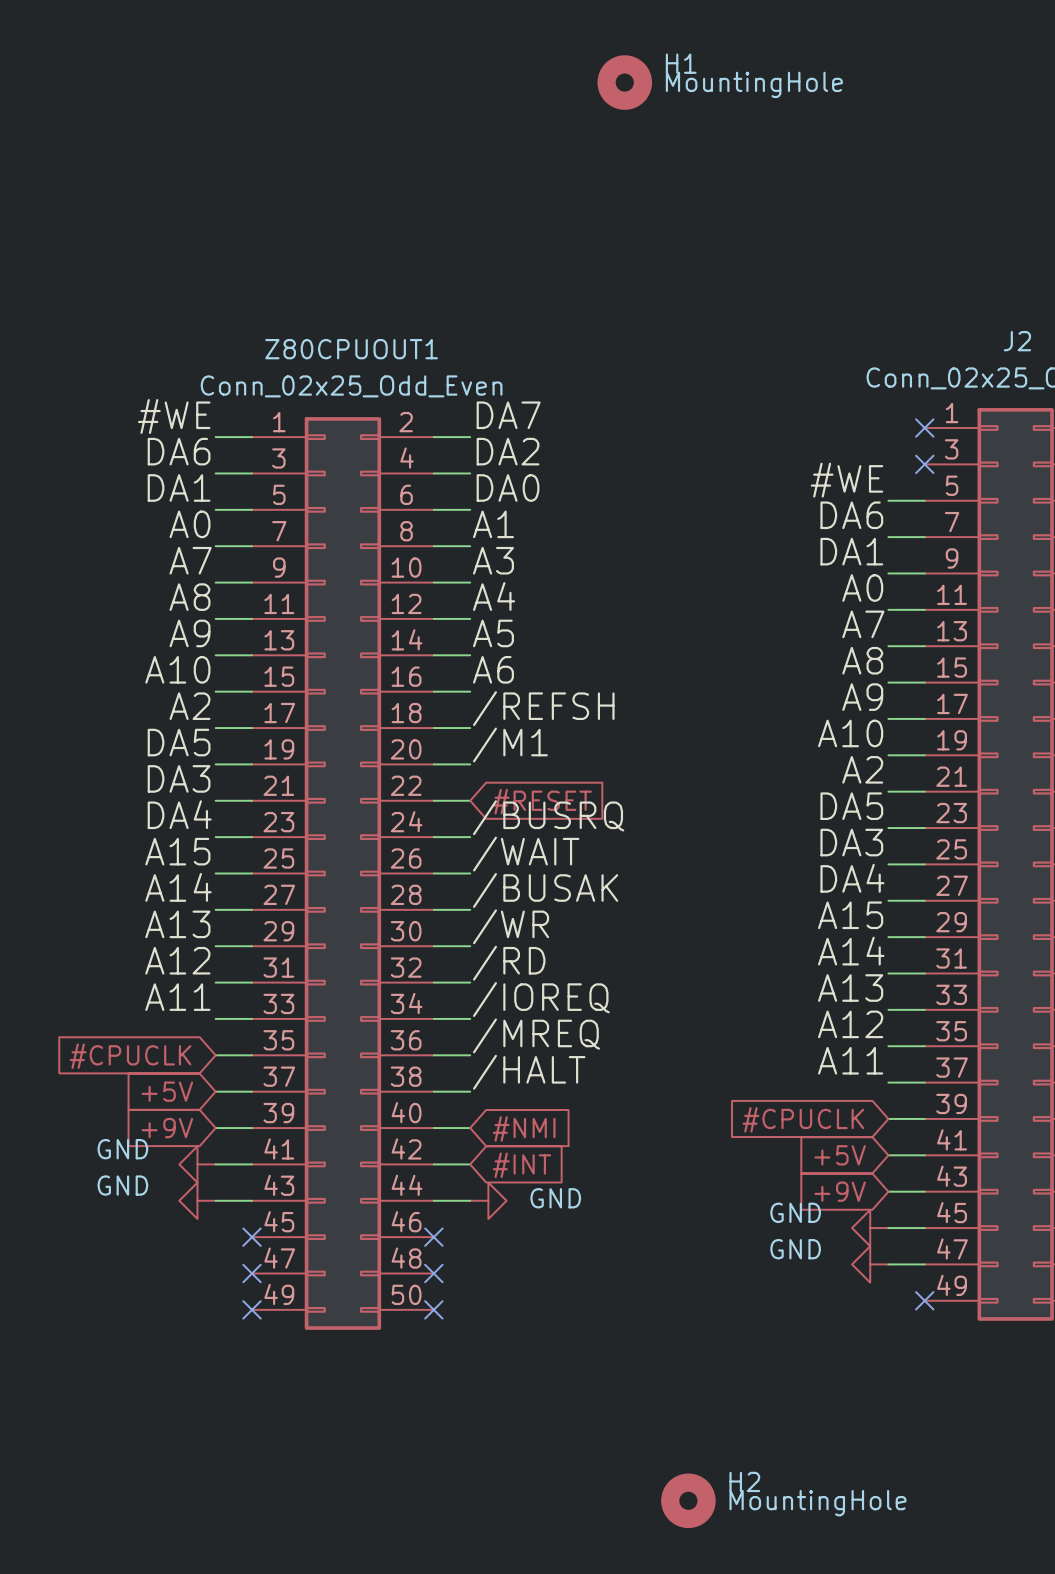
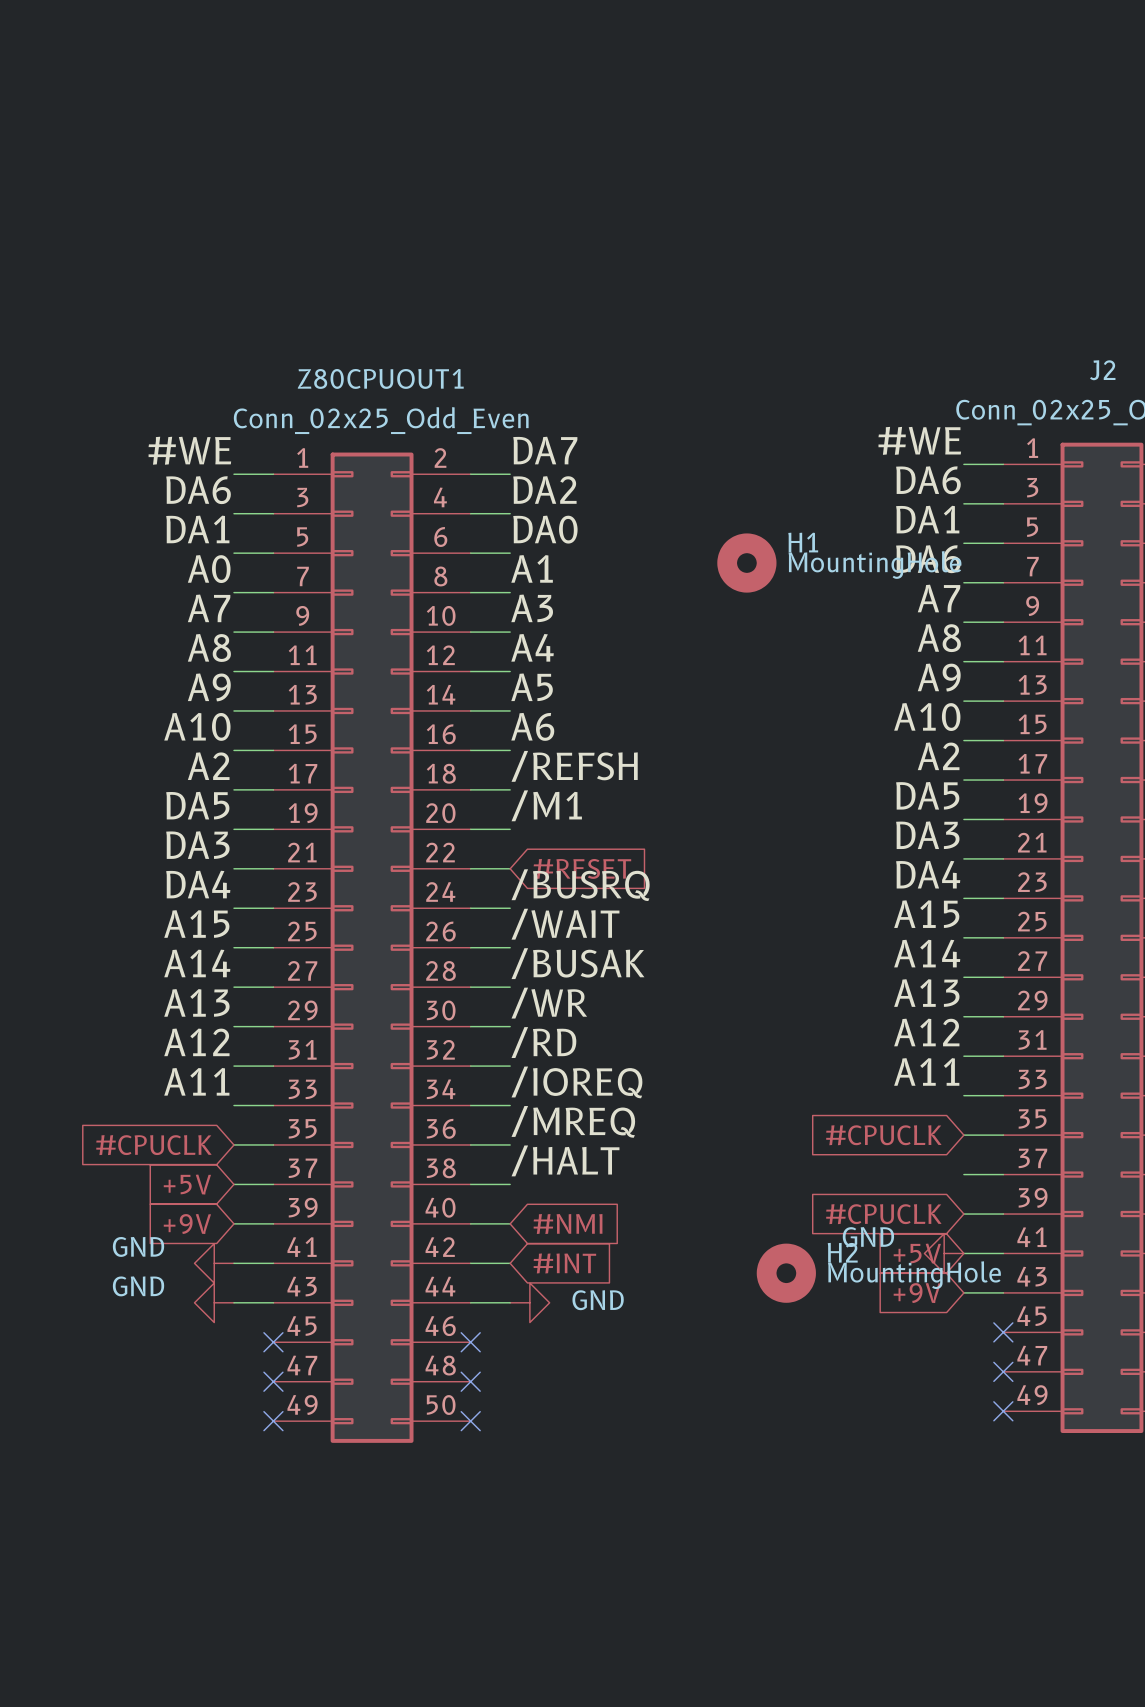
H1 position: (624, 82) -> (746, 563)
label: none -> #WE (919, 440)
wire: none -> (963, 464) (1003, 464)
no-connect mark: (924, 428) -> none
label: none -> DA6 (928, 480)
wire: none -> (963, 503) (1003, 503)
no-connect mark: (924, 464) -> none
label: #WE (846, 480) -> DA1 (927, 519)
label: DA1 (851, 551) -> A7 (939, 598)
label: A0 (862, 588) -> A8 (939, 638)
label: A7 (863, 624) -> A9 (939, 677)
label: A8 (862, 660) -> A10 (927, 717)
label: A9 (862, 697) -> A2 (938, 756)
label: A10 (850, 733) -> DA5 (927, 795)
label: A2 (862, 769) -> DA3 (927, 835)
label: DA5 (851, 806) -> DA4 (928, 874)
label: DA3 (851, 842) -> A15 (926, 914)
label: DA4 (852, 878) -> A14 (927, 953)
label: A15 (850, 915) -> A13 (926, 993)
label: A14 (851, 951) -> A12 (926, 1032)
label: A13 (850, 988) -> A11 (926, 1071)
label: A12 (850, 1024) -> none
global label: none -> #CPUCLK (883, 1135)
label: A11 (850, 1060) -> none
power symbol: none -> GND (944, 1253)
power symbol: GND (870, 1228) -> none
wire: (888, 1228) (924, 1228) -> none
no-connect mark: none -> (1003, 1332)
power symbol: GND (870, 1264) -> none
wire: (888, 1264) (924, 1264) -> none
no-connect mark: none -> (1003, 1371)
H2 position: (688, 1500) -> (786, 1273)

